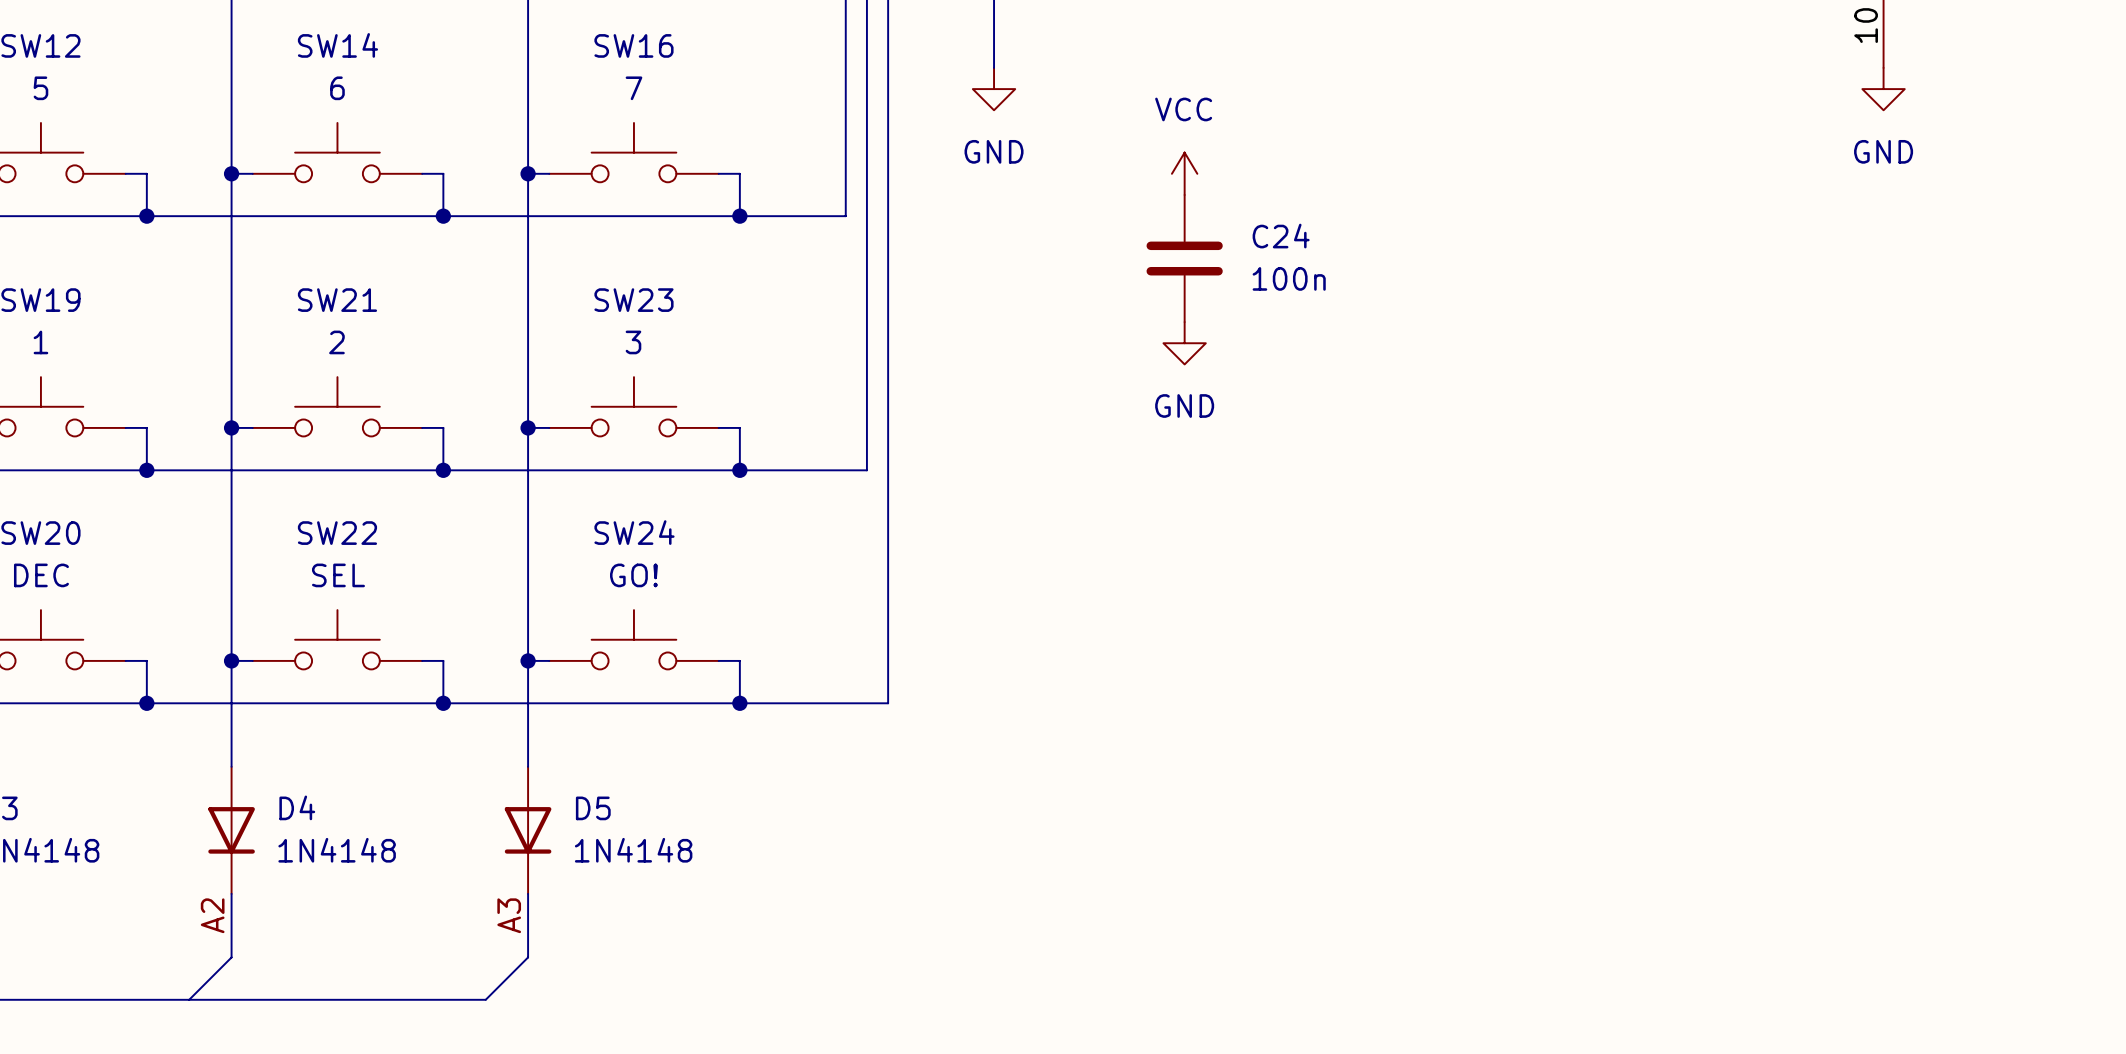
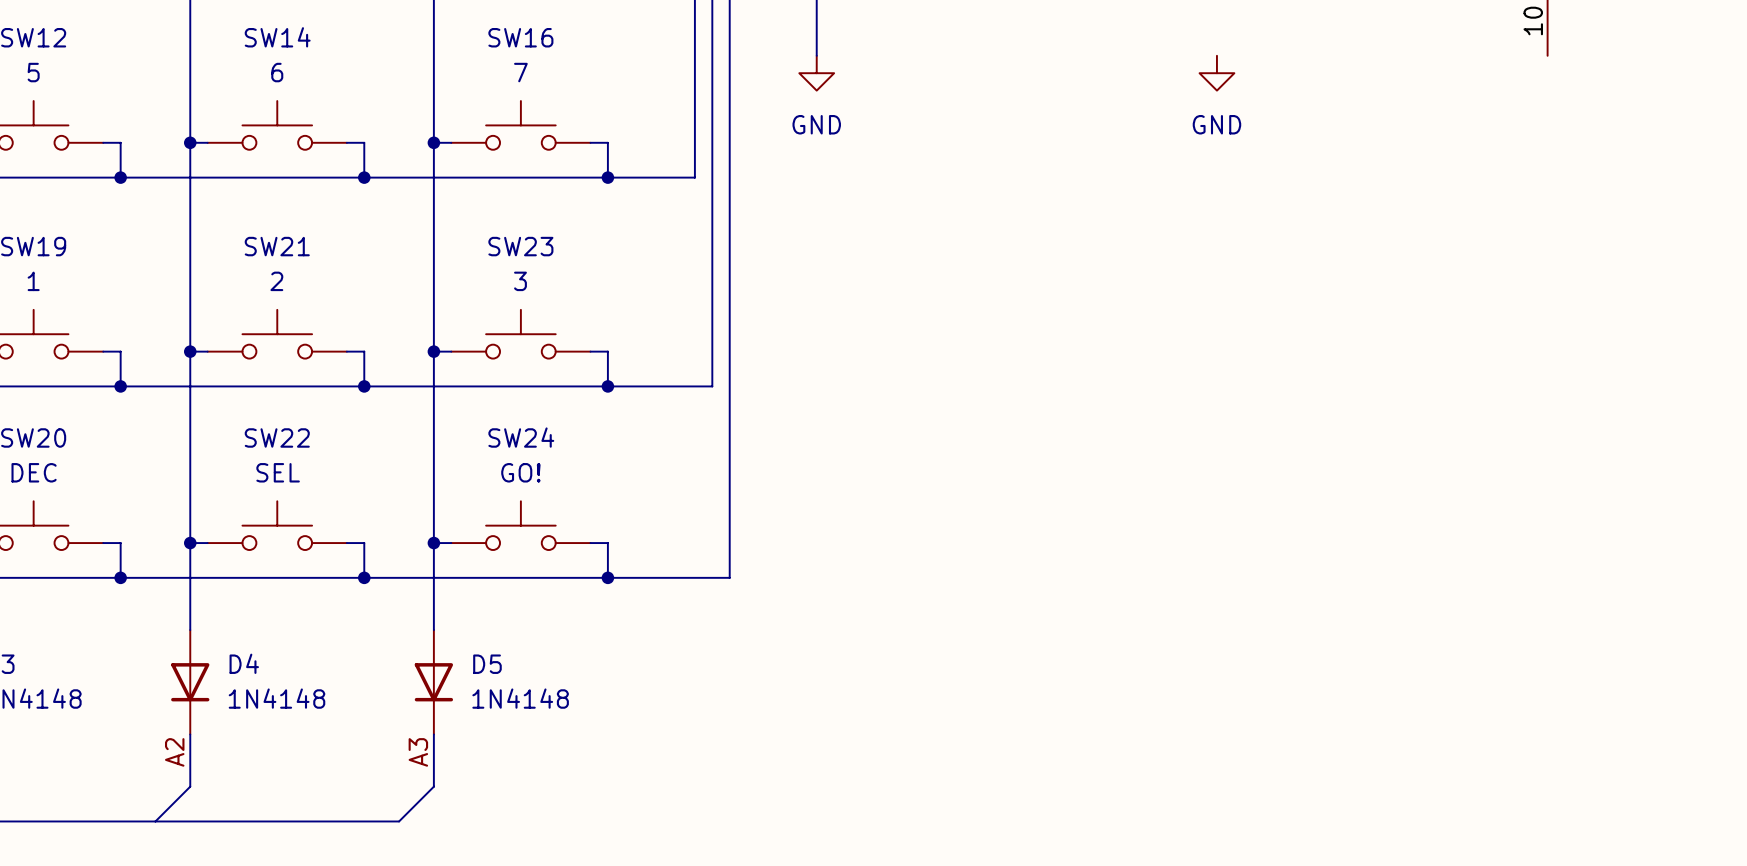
power symbol: none -> GND (1216, 73)
power symbol: GND (1883, 89) -> none
power symbol: VCC (1184, 173) -> none
C24: 100n (1184, 258) -> none
power symbol: GND (1184, 343) -> none

